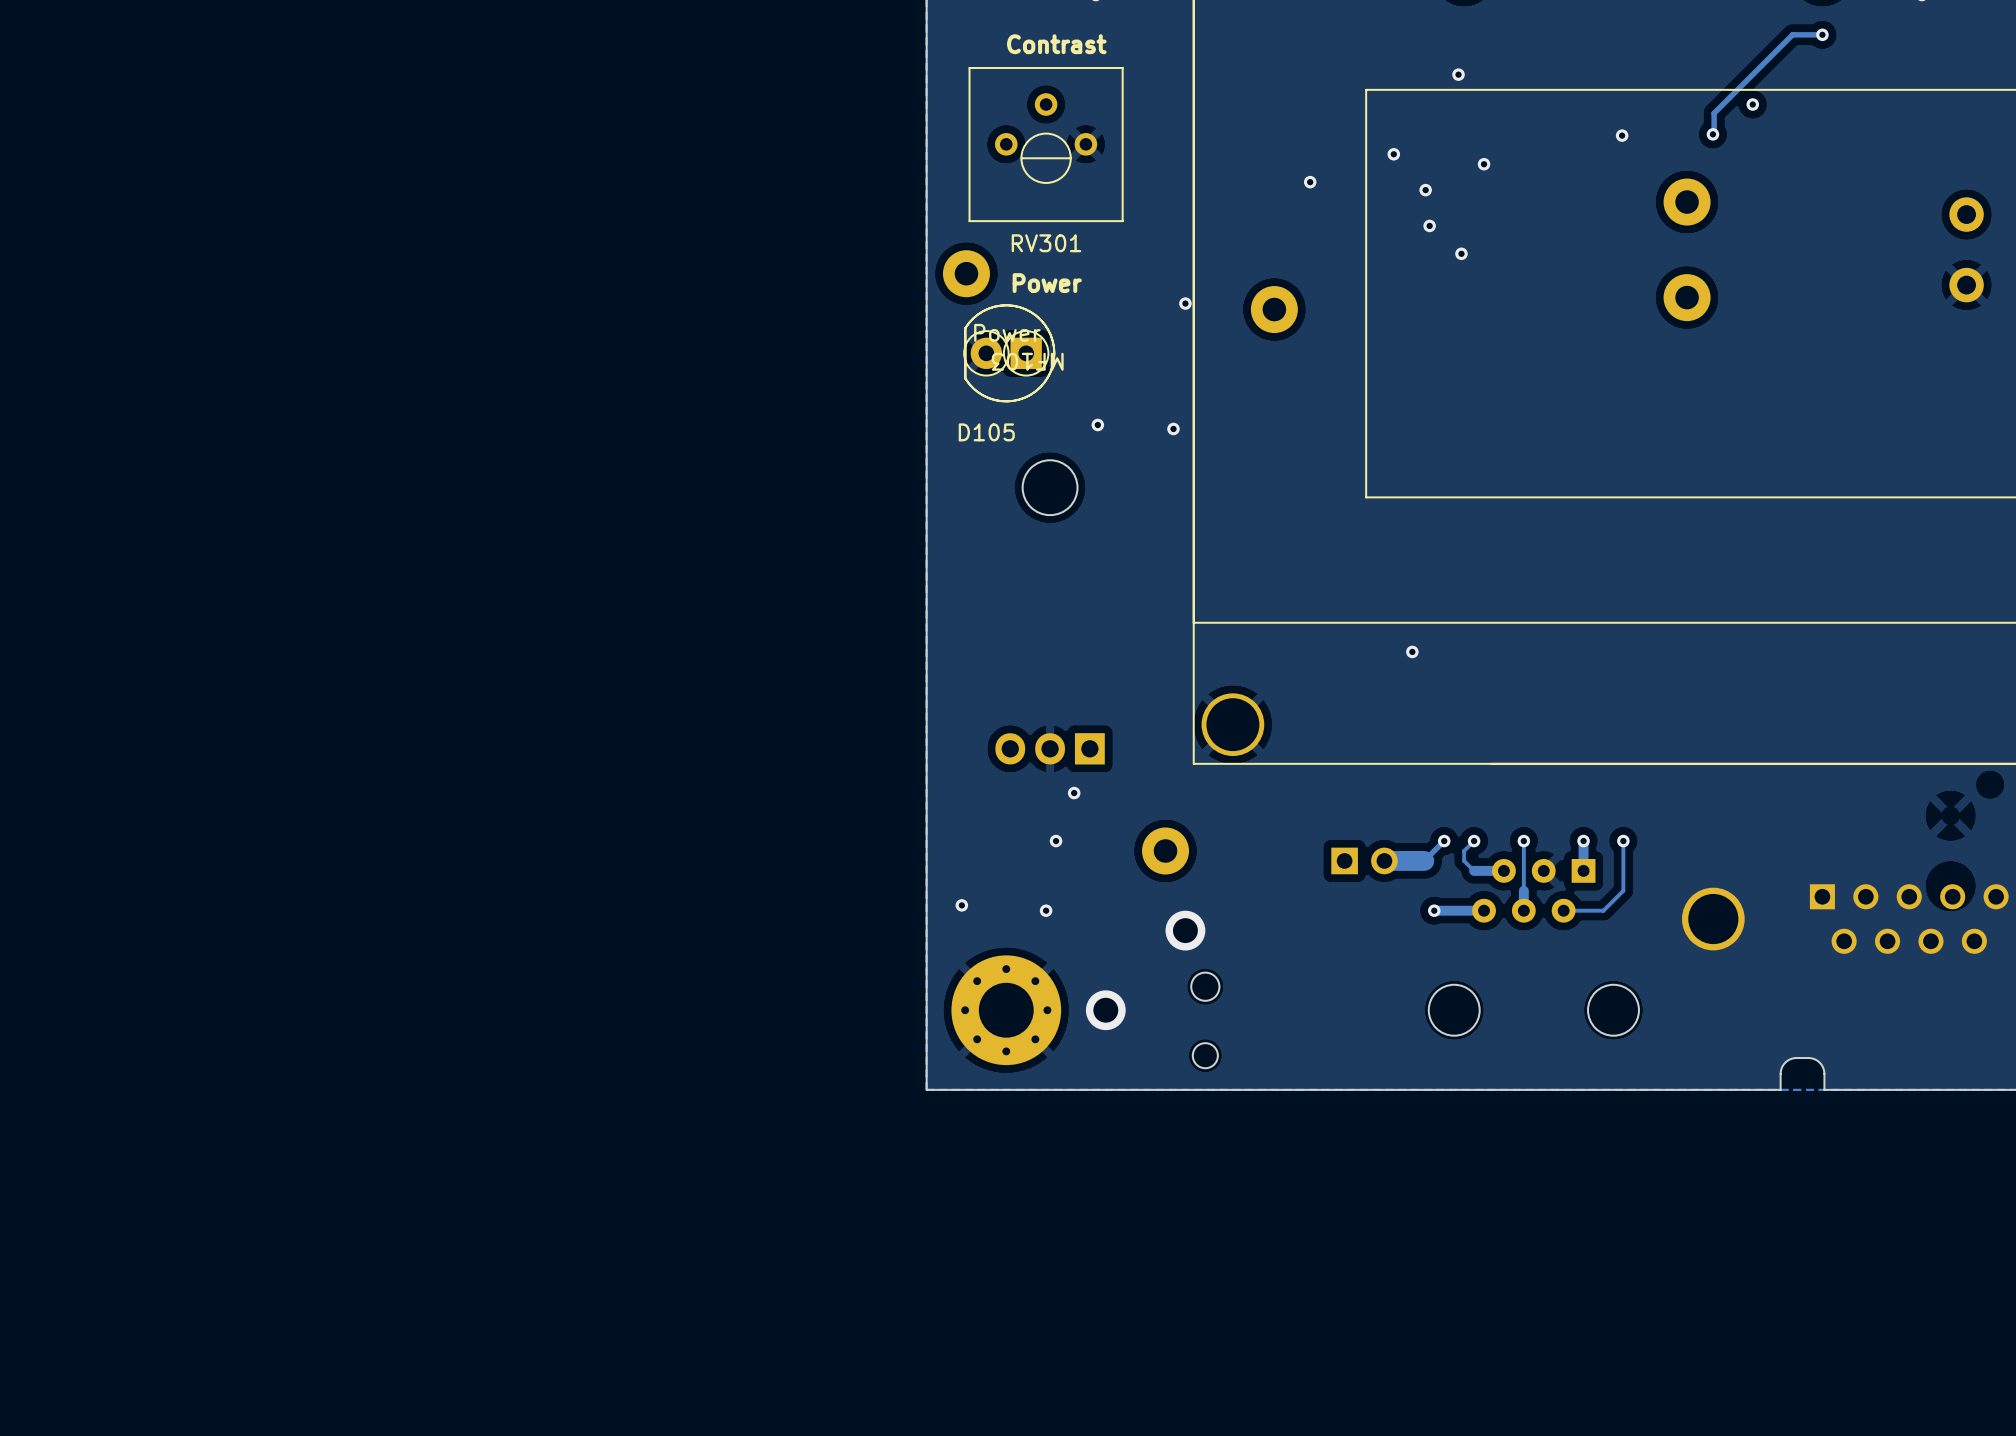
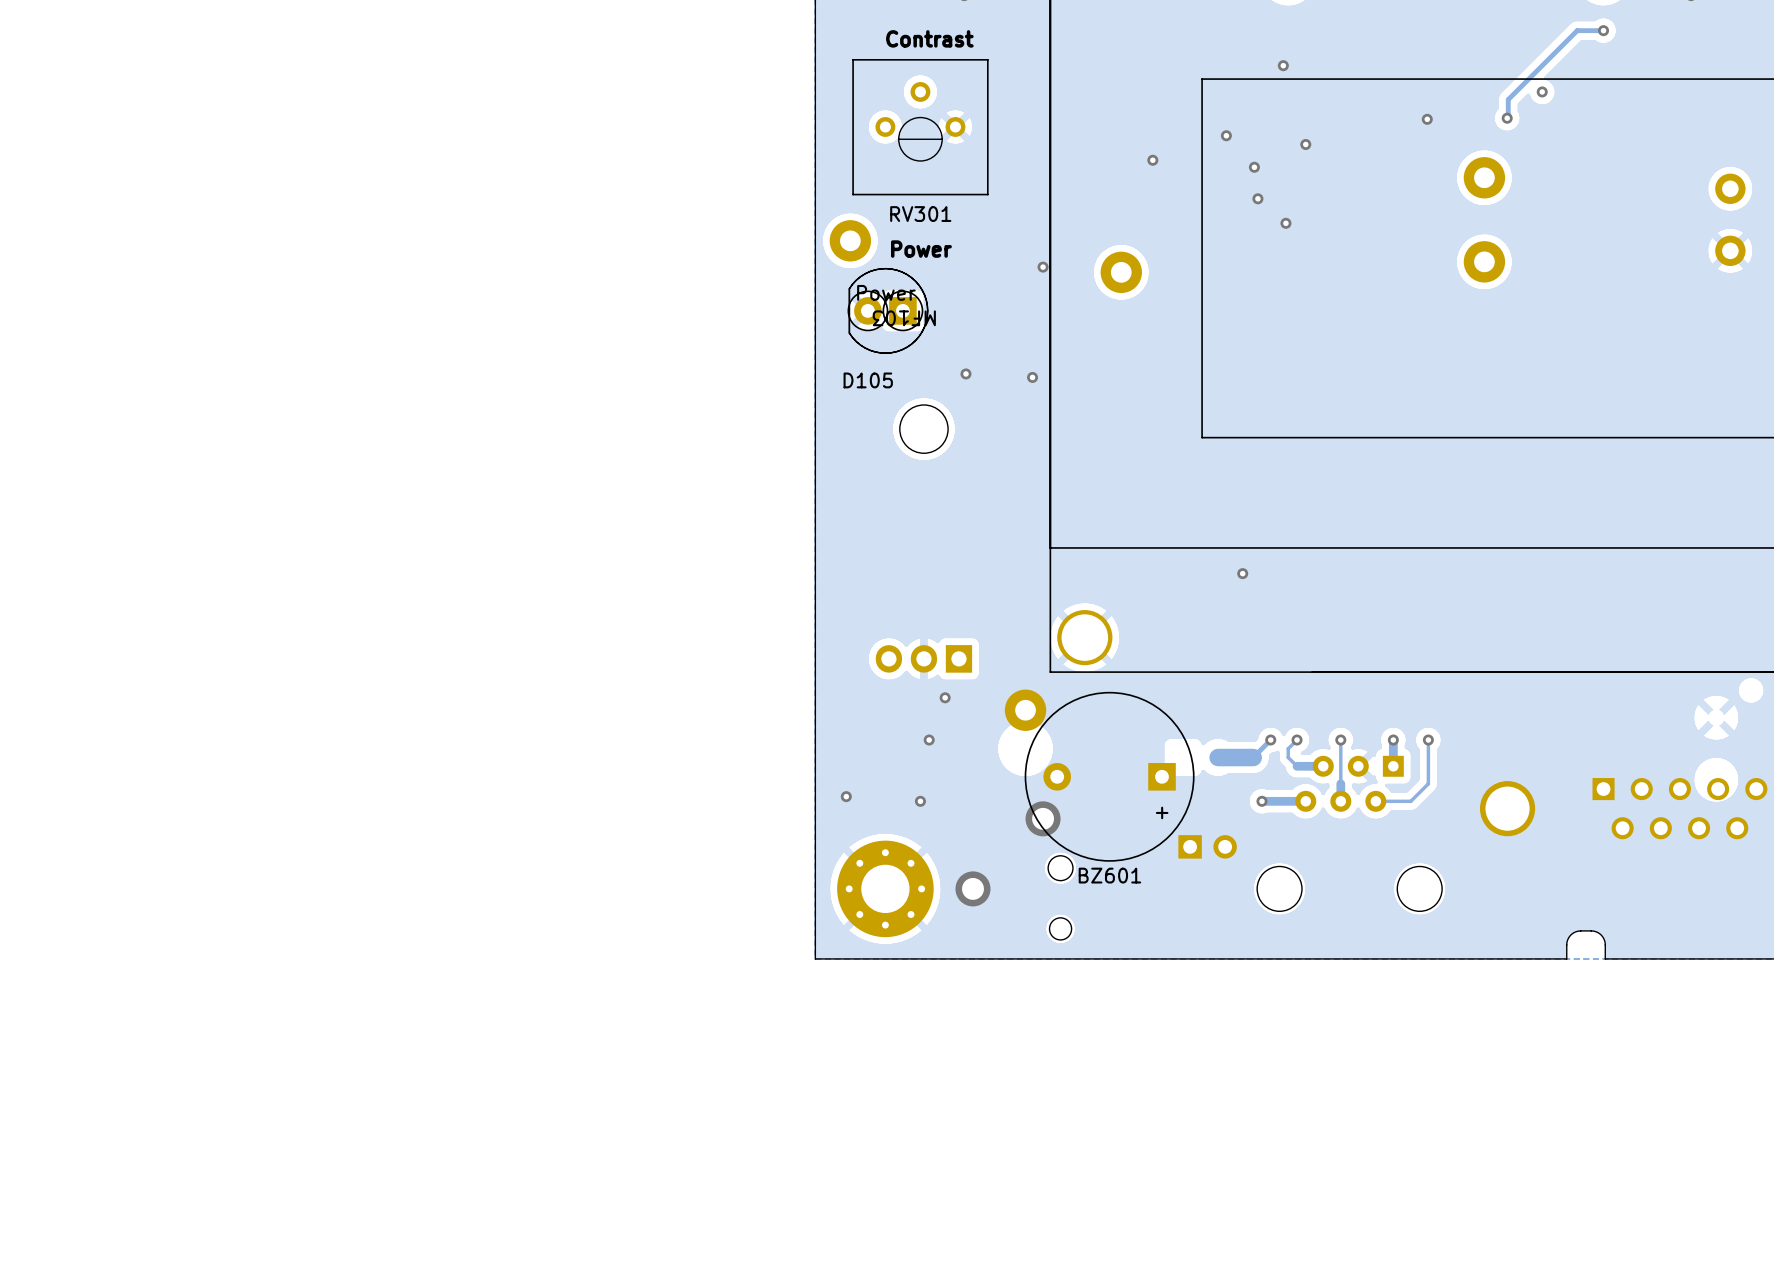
part position: (1165, 850) -> (1025, 710)
part position: (1364, 860) -> (1207, 846)
BZ601: none -> (1109, 776)

